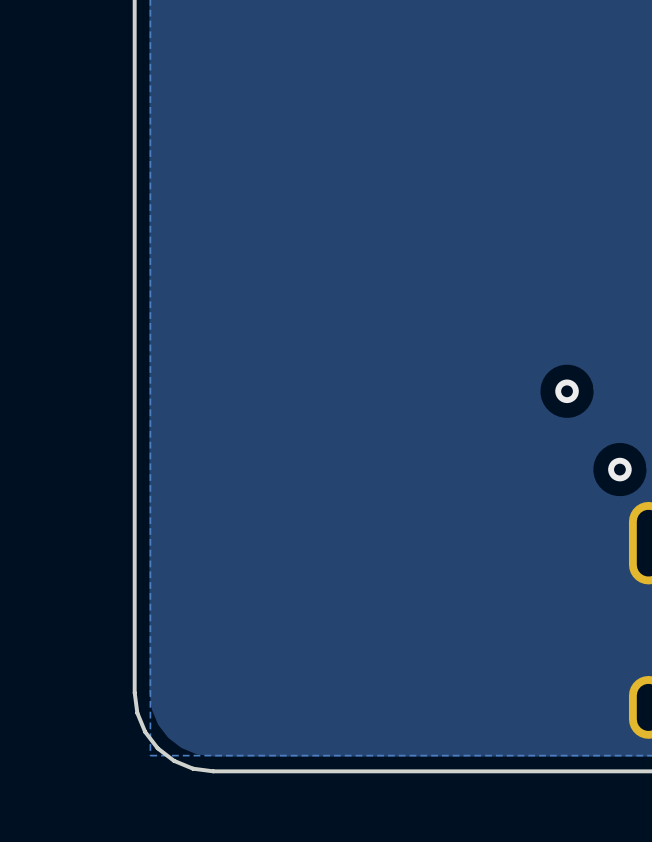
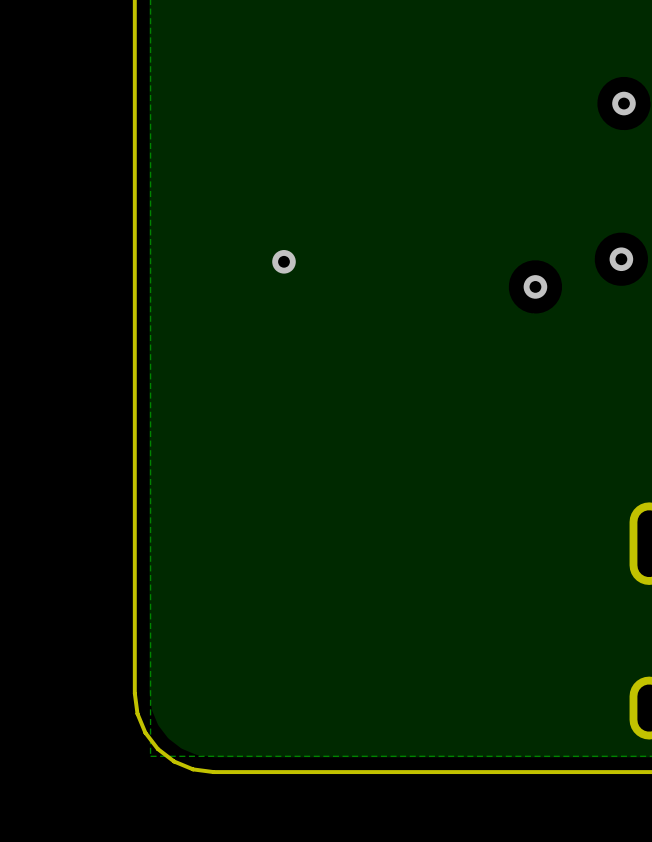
via: none -> (623, 103)
via: none -> (621, 259)
via: none -> (284, 261)
via: none -> (535, 286)
via: (567, 391) -> none
via: (619, 469) -> none

